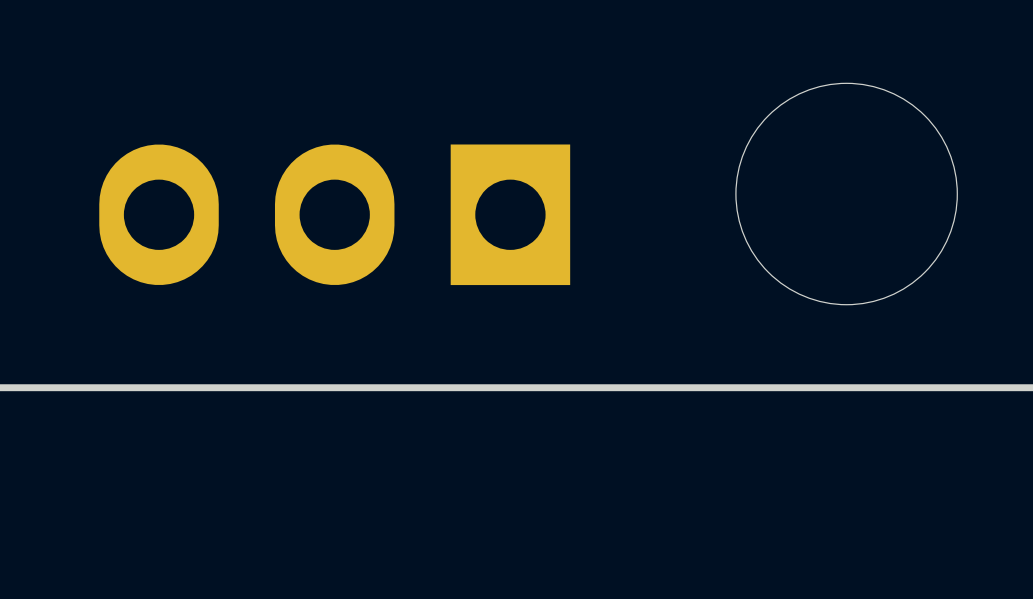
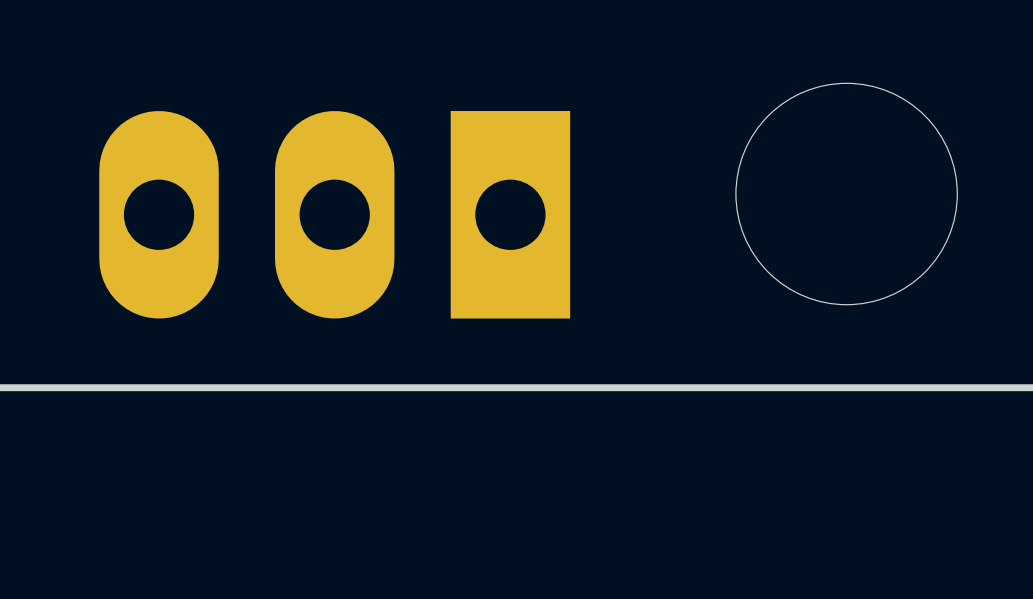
part footprint: [99, 144, 571, 286] -> [99, 111, 571, 319]

